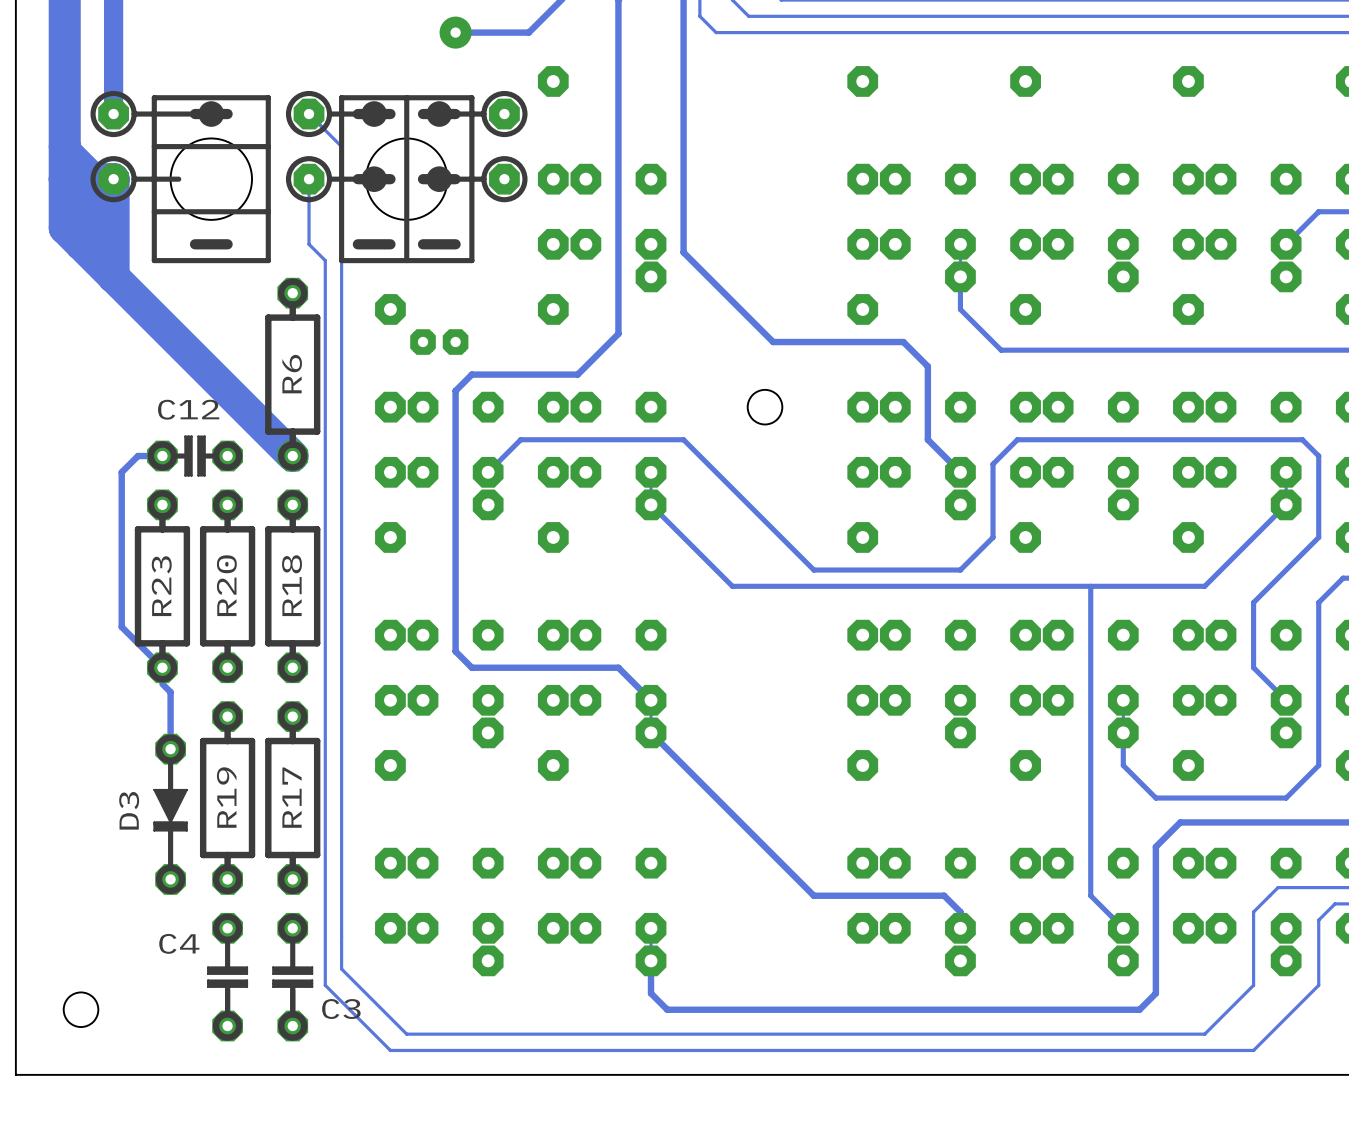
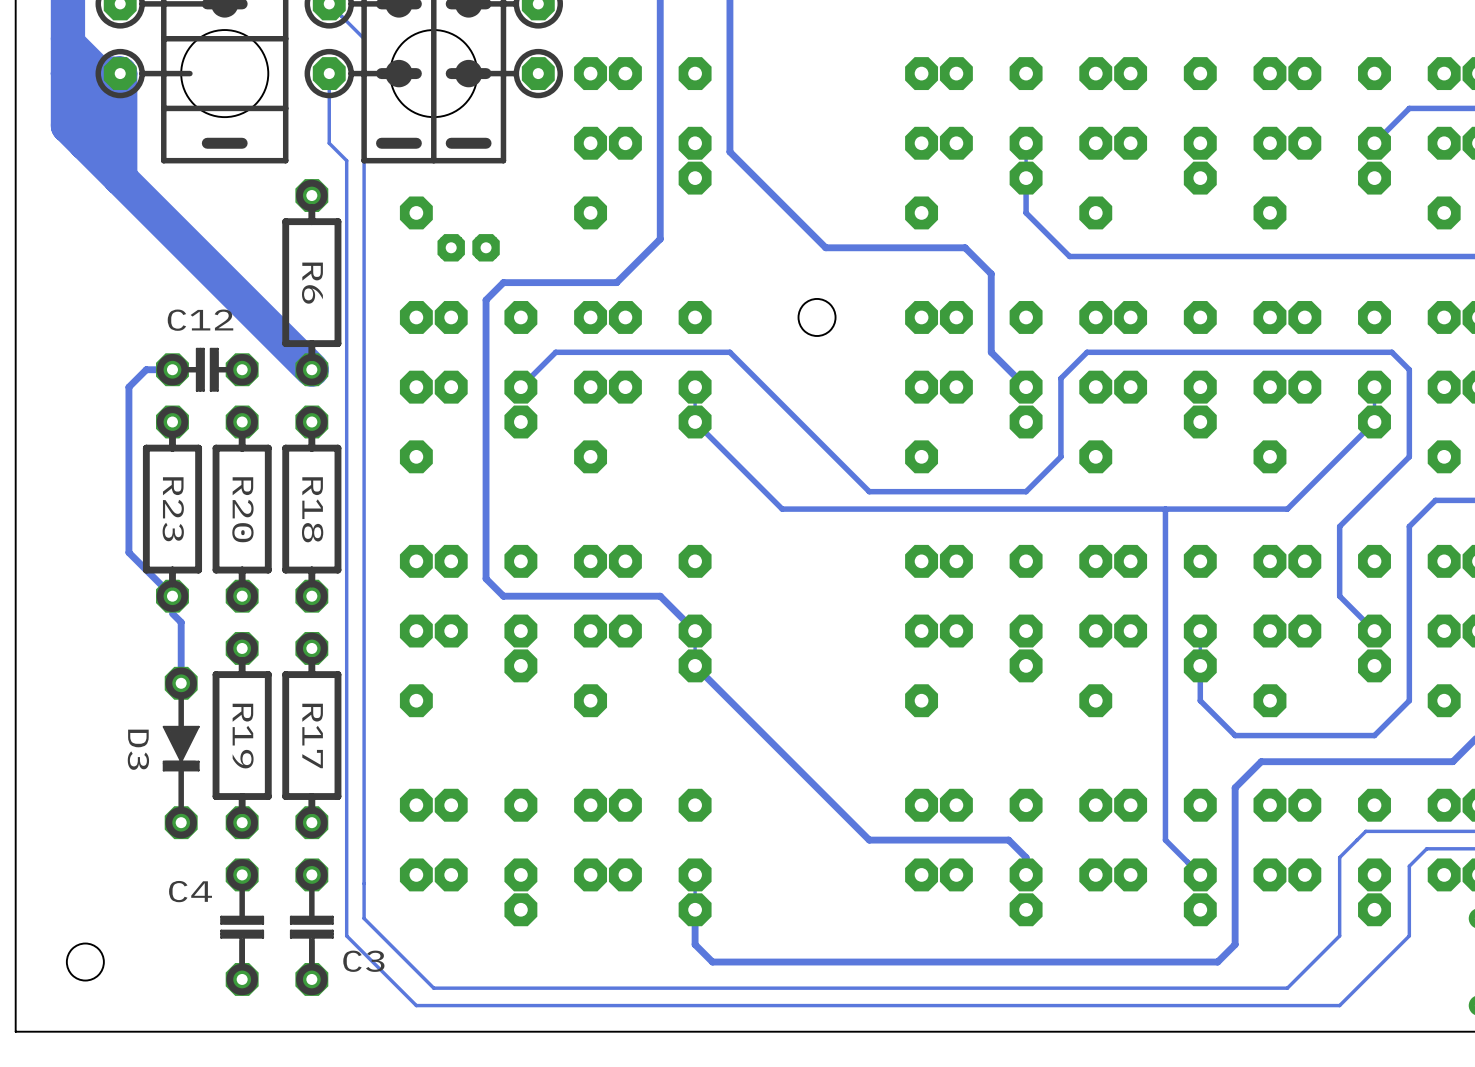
R6 name rotation: 0° (292, 374) -> 180° (312, 283)
R20 name rotation: 0° (226, 585) -> 180° (242, 509)
R18 name rotation: 0° (292, 585) -> 180° (312, 509)
R23 name rotation: 0° (161, 586) -> 180° (173, 509)
R19 name rotation: 0° (226, 797) -> 180° (243, 736)
R17 name rotation: 0° (292, 797) -> 180° (312, 735)
D3 name rotation: 0° (129, 810) -> 180° (138, 749)

